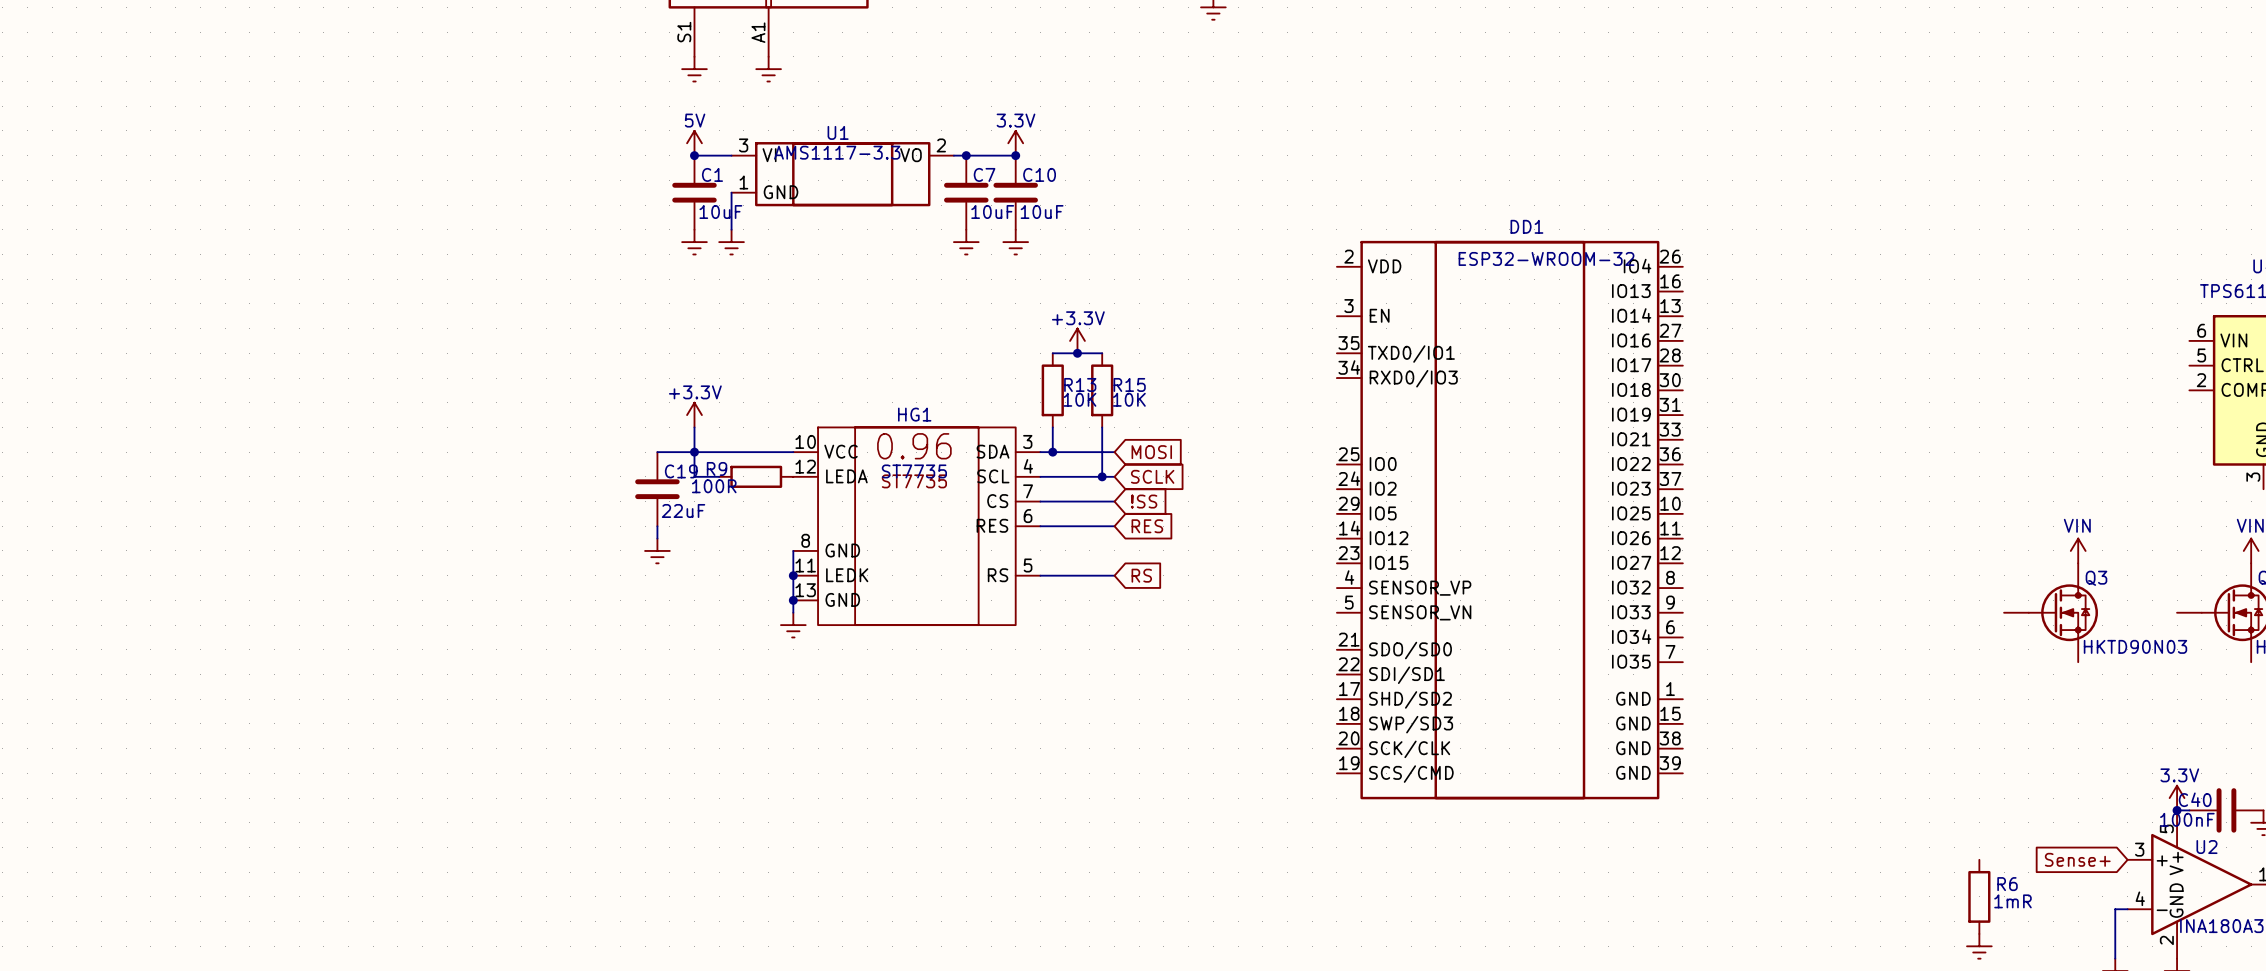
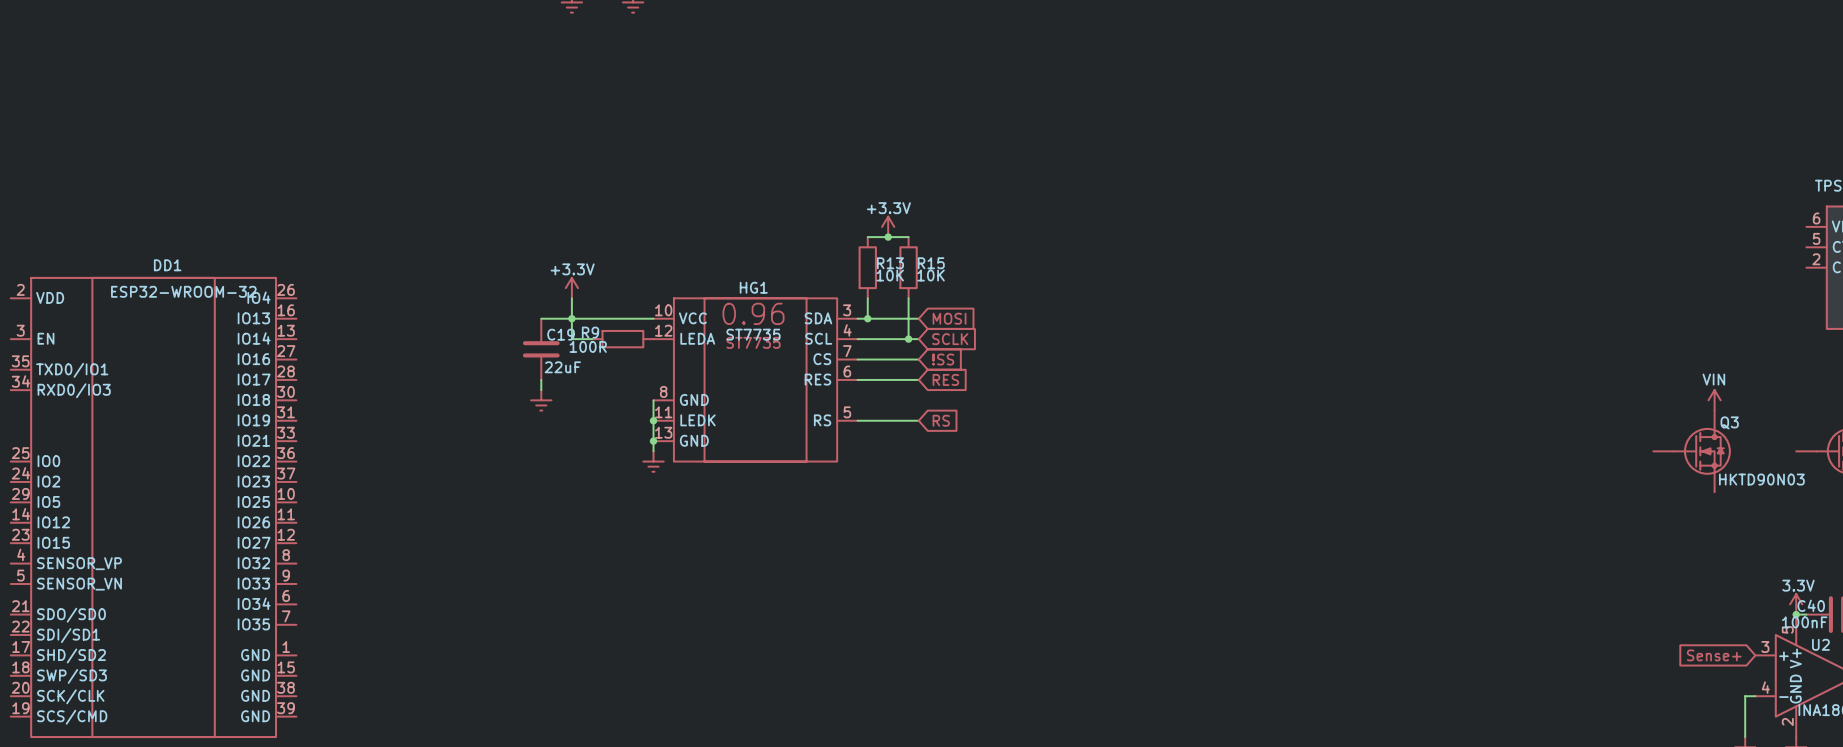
power symbol: 5V (694, 143) -> none
power symbol: 3.3V (1015, 143) -> none
wire: (694, 155) (731, 155) -> none
junction: (694, 155) -> none
wire: (953, 155) (1015, 155) -> none
junction: (966, 155) -> none
junction: (1015, 155) -> none
U1: AMS1117-3.3 (842, 174) -> none
C1: 10uF (694, 192) -> none
wire: (731, 192) (731, 229) -> none
C7: 10uF (966, 192) -> none
C10: 10uF (1015, 192) -> none
power symbol: (694, 242) -> none
power symbol: (731, 242) -> none
power symbol: (966, 242) -> none
power symbol: (1015, 242) -> none
DD1 position: (1509, 520) -> (153, 507)
R6: 1mR (1979, 896) -> none
power symbol: (1979, 946) -> none

